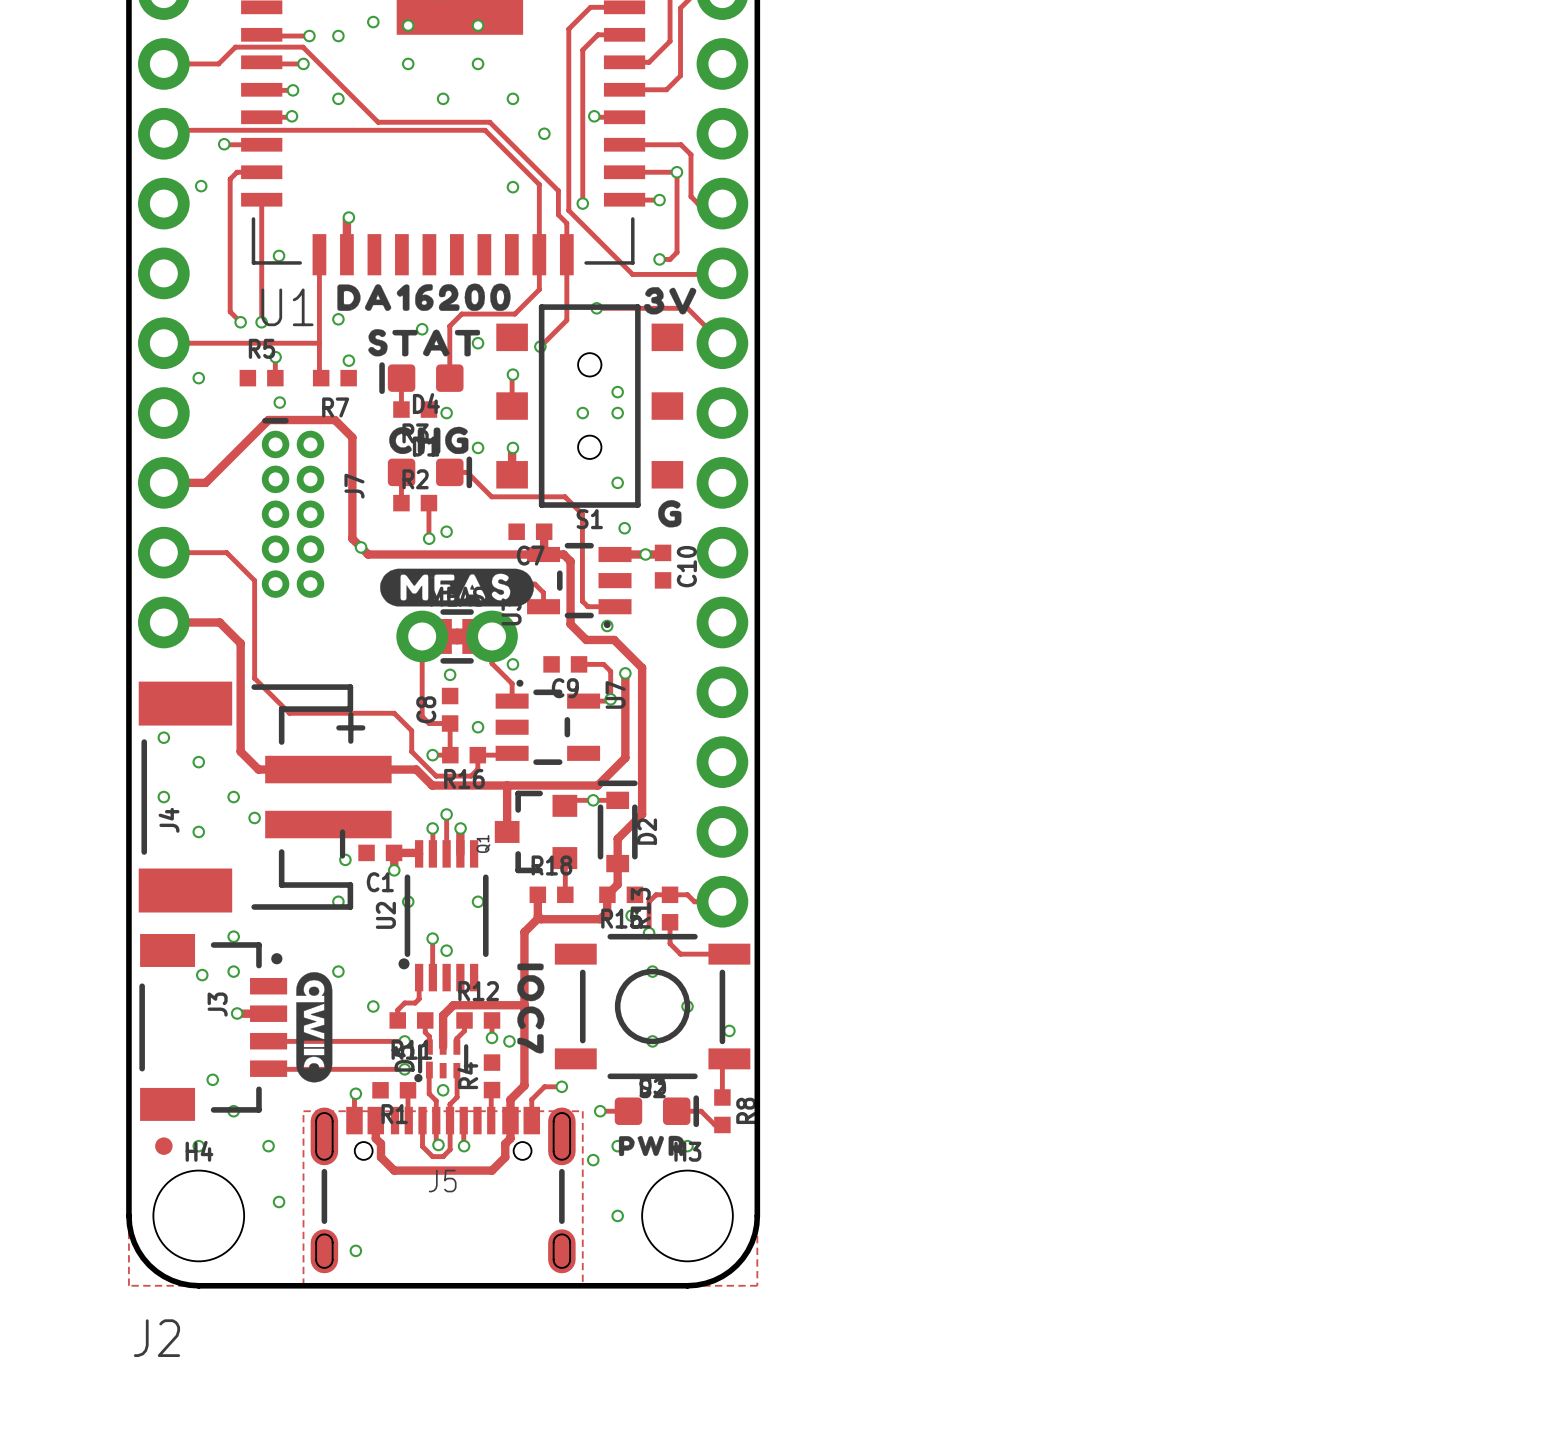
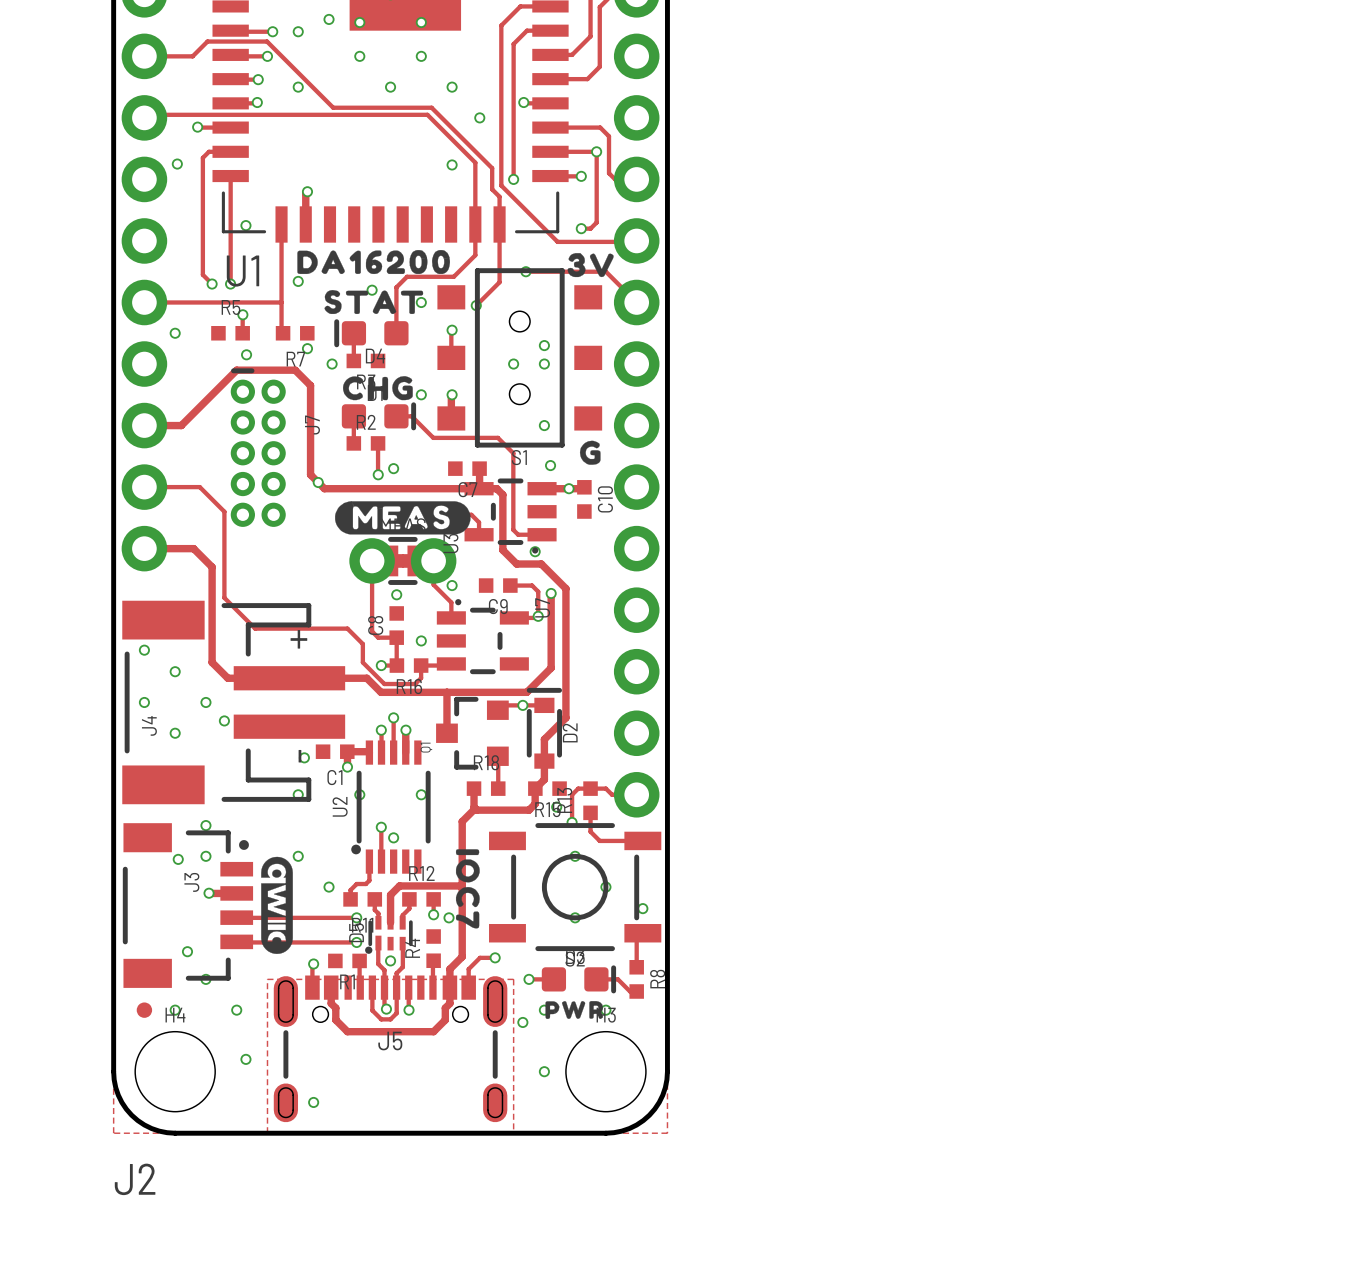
via: (348, 360) -> none
via: none -> (307, 348)
via: none -> (332, 364)
via: (446, 413) -> none

